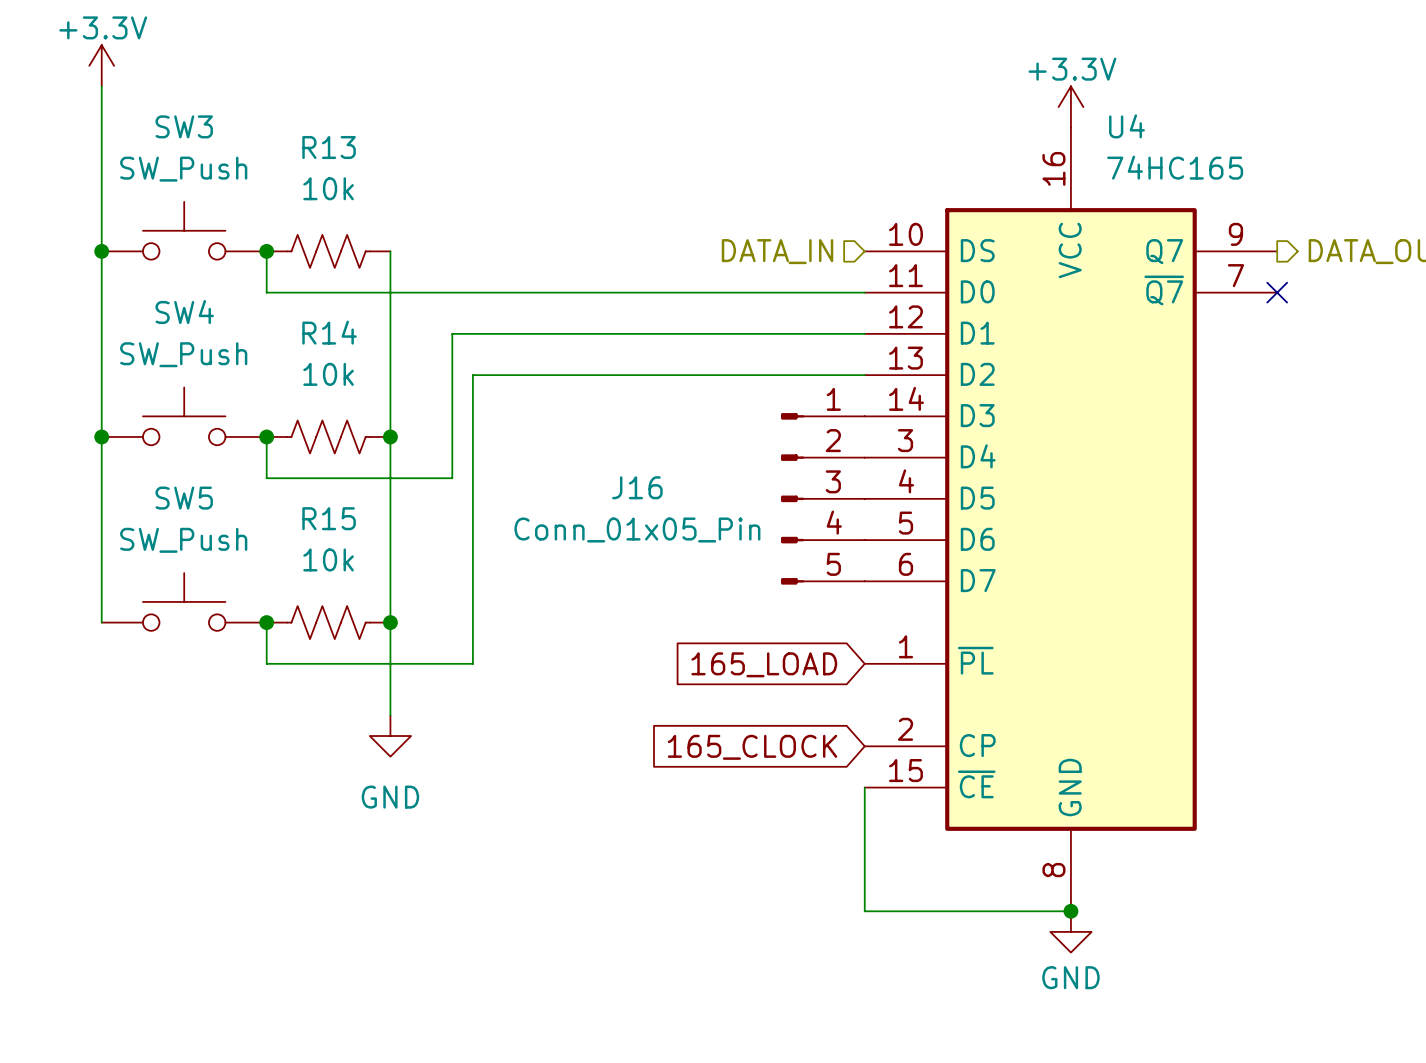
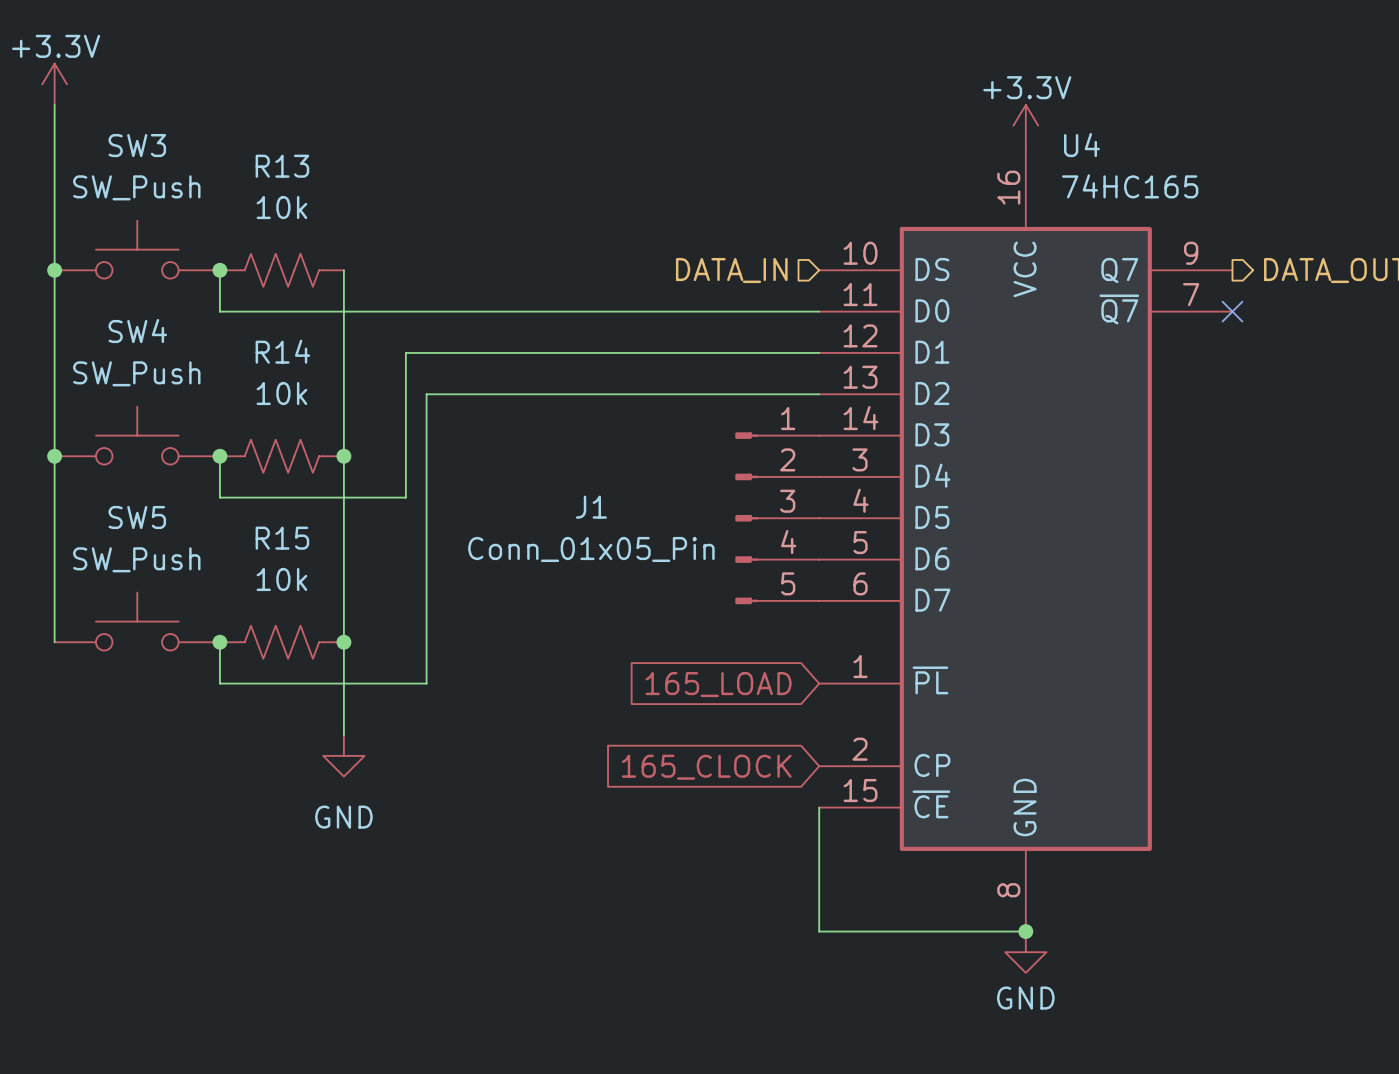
J16 name: J16 (637, 487) -> J1 (591, 507)

